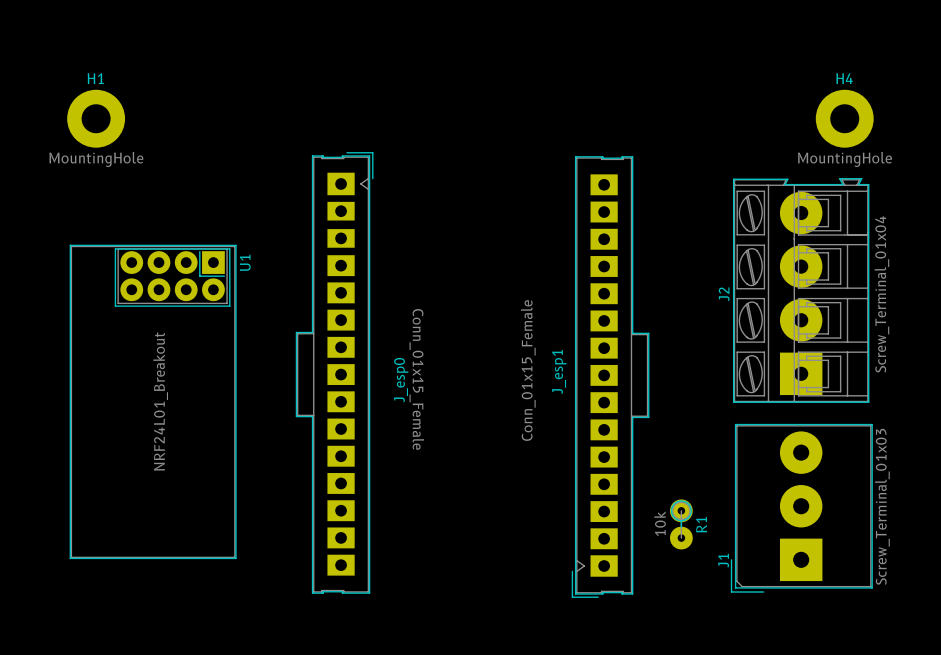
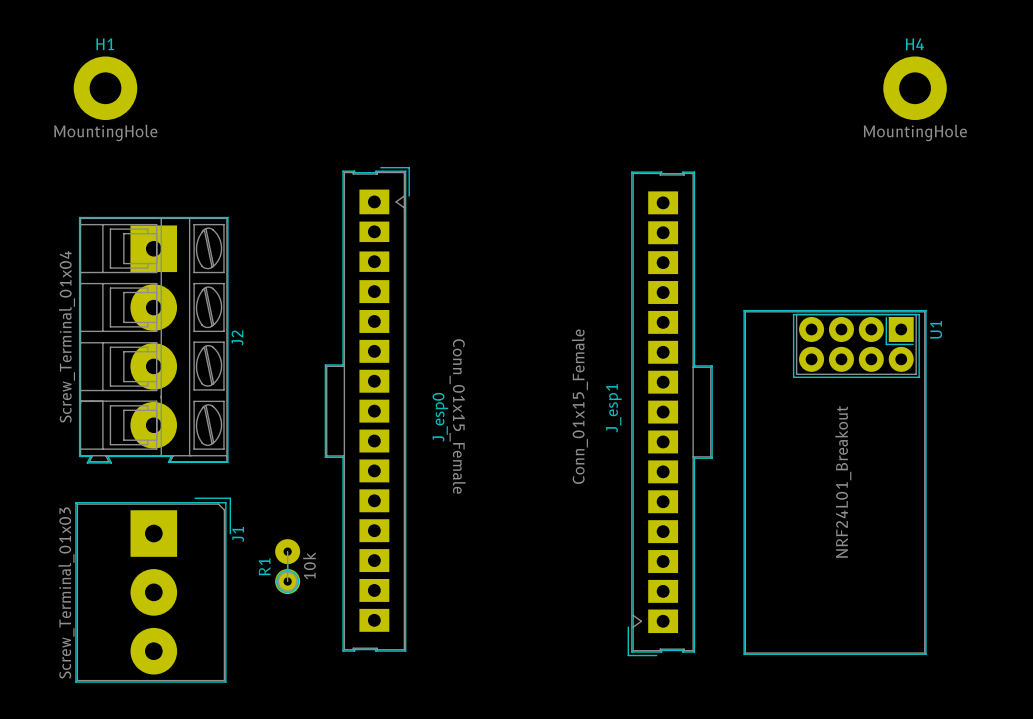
H1 position: (96, 118) -> (105, 88)
H4 position: (844, 118) -> (915, 88)
J2 rotation: 0° (801, 290) -> 180° (153, 340)
J2 position: (801, 290) -> (153, 340)
U1 position: (153, 401) -> (835, 482)
J1 rotation: 0° (801, 508) -> 180° (153, 590)
J1 position: (801, 508) -> (153, 590)
R1 rotation: 0° (681, 524) -> 180° (287, 566)
R1 position: (681, 524) -> (287, 566)

